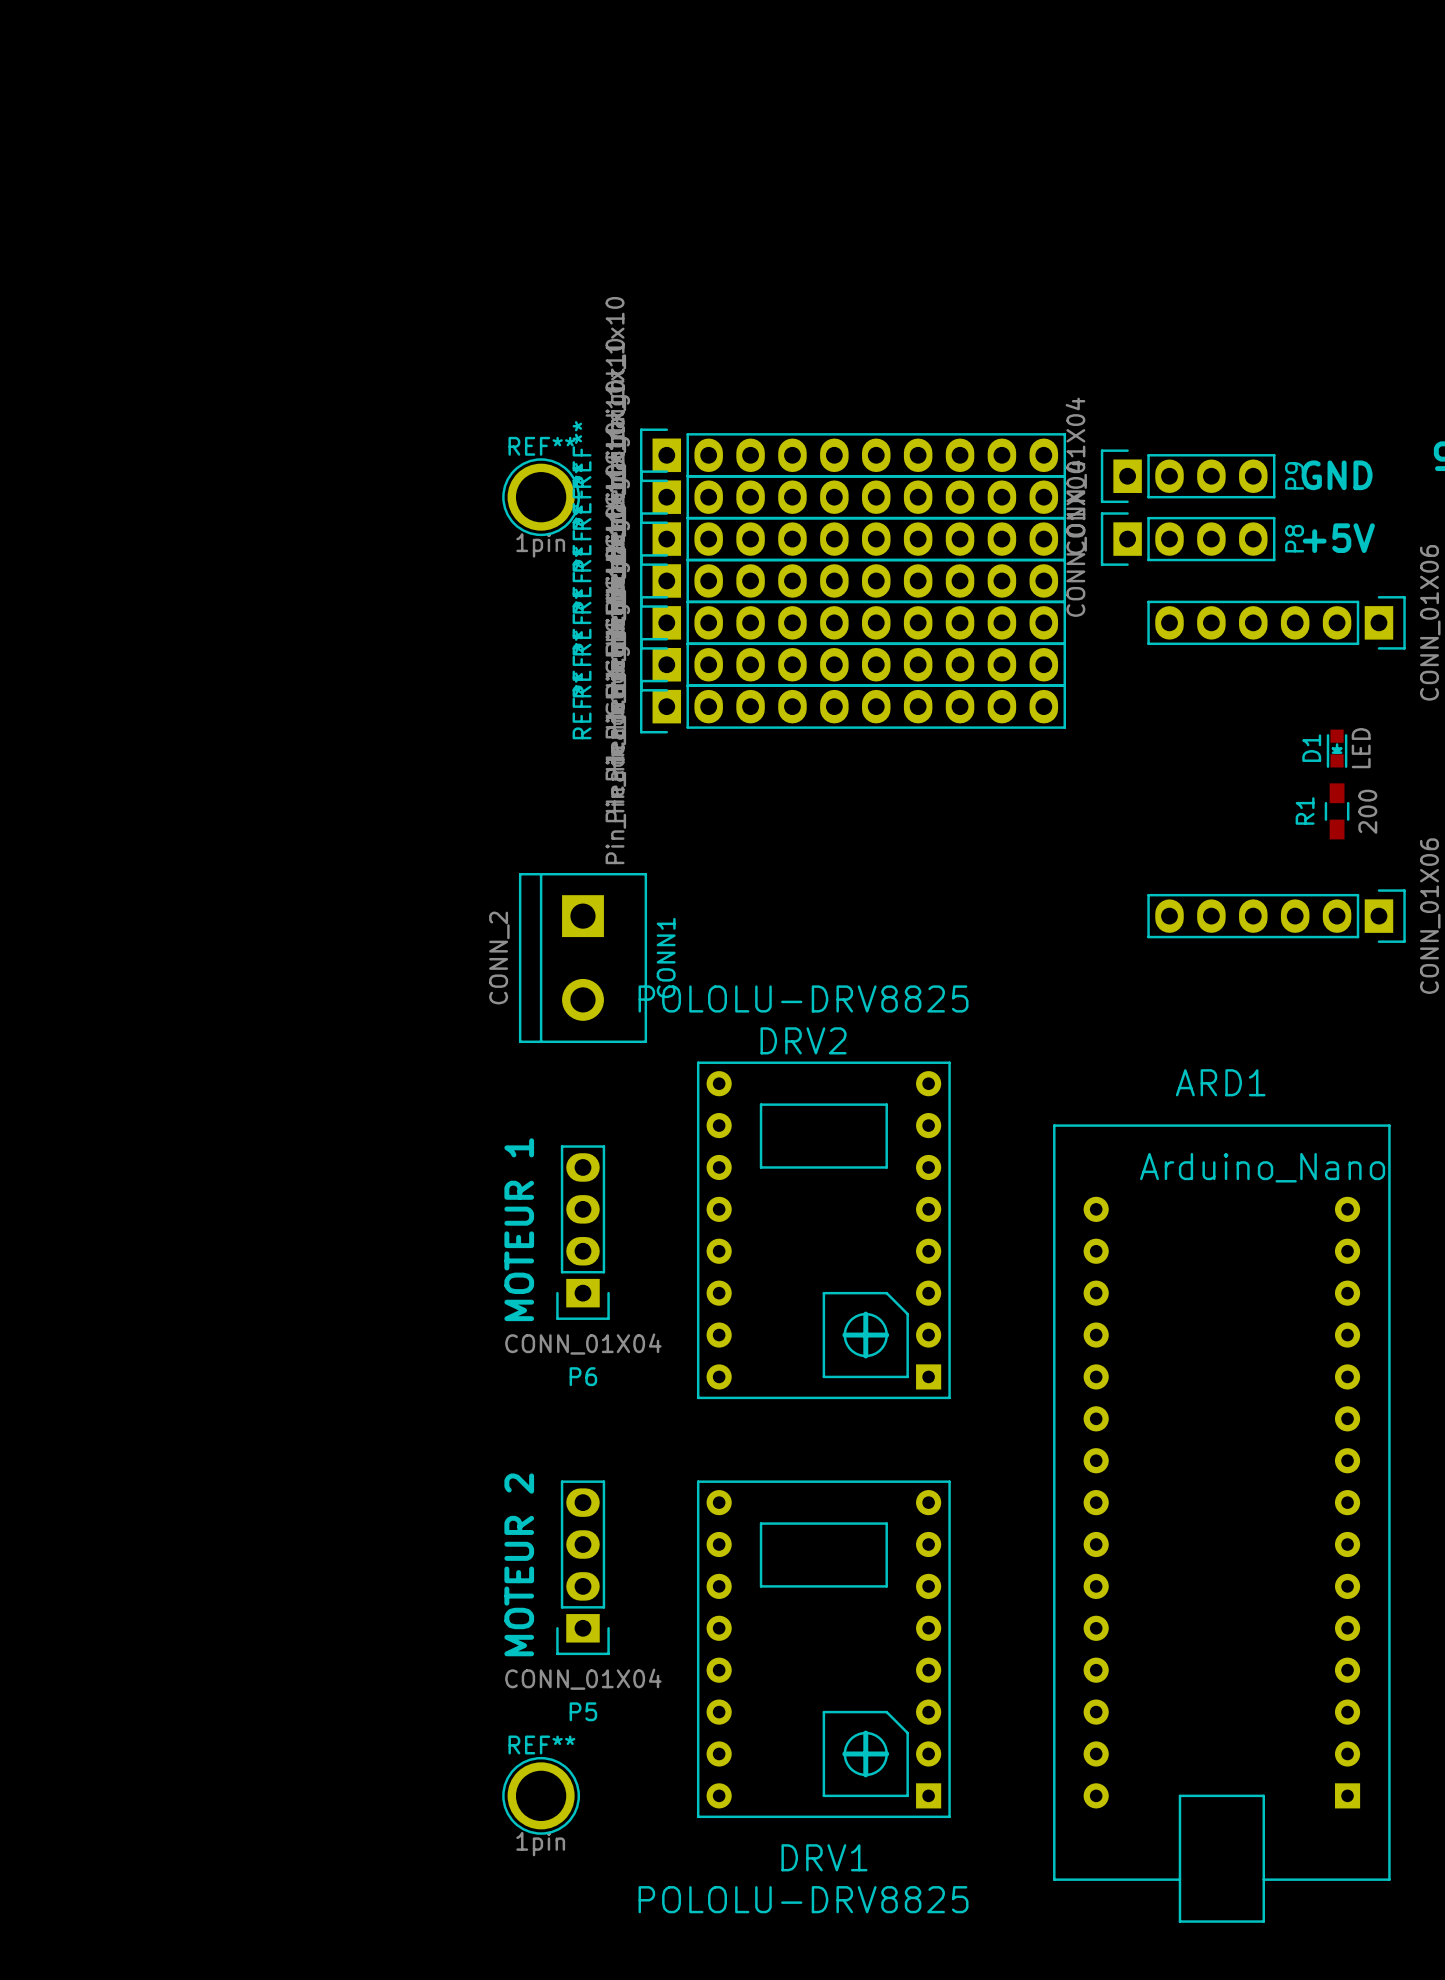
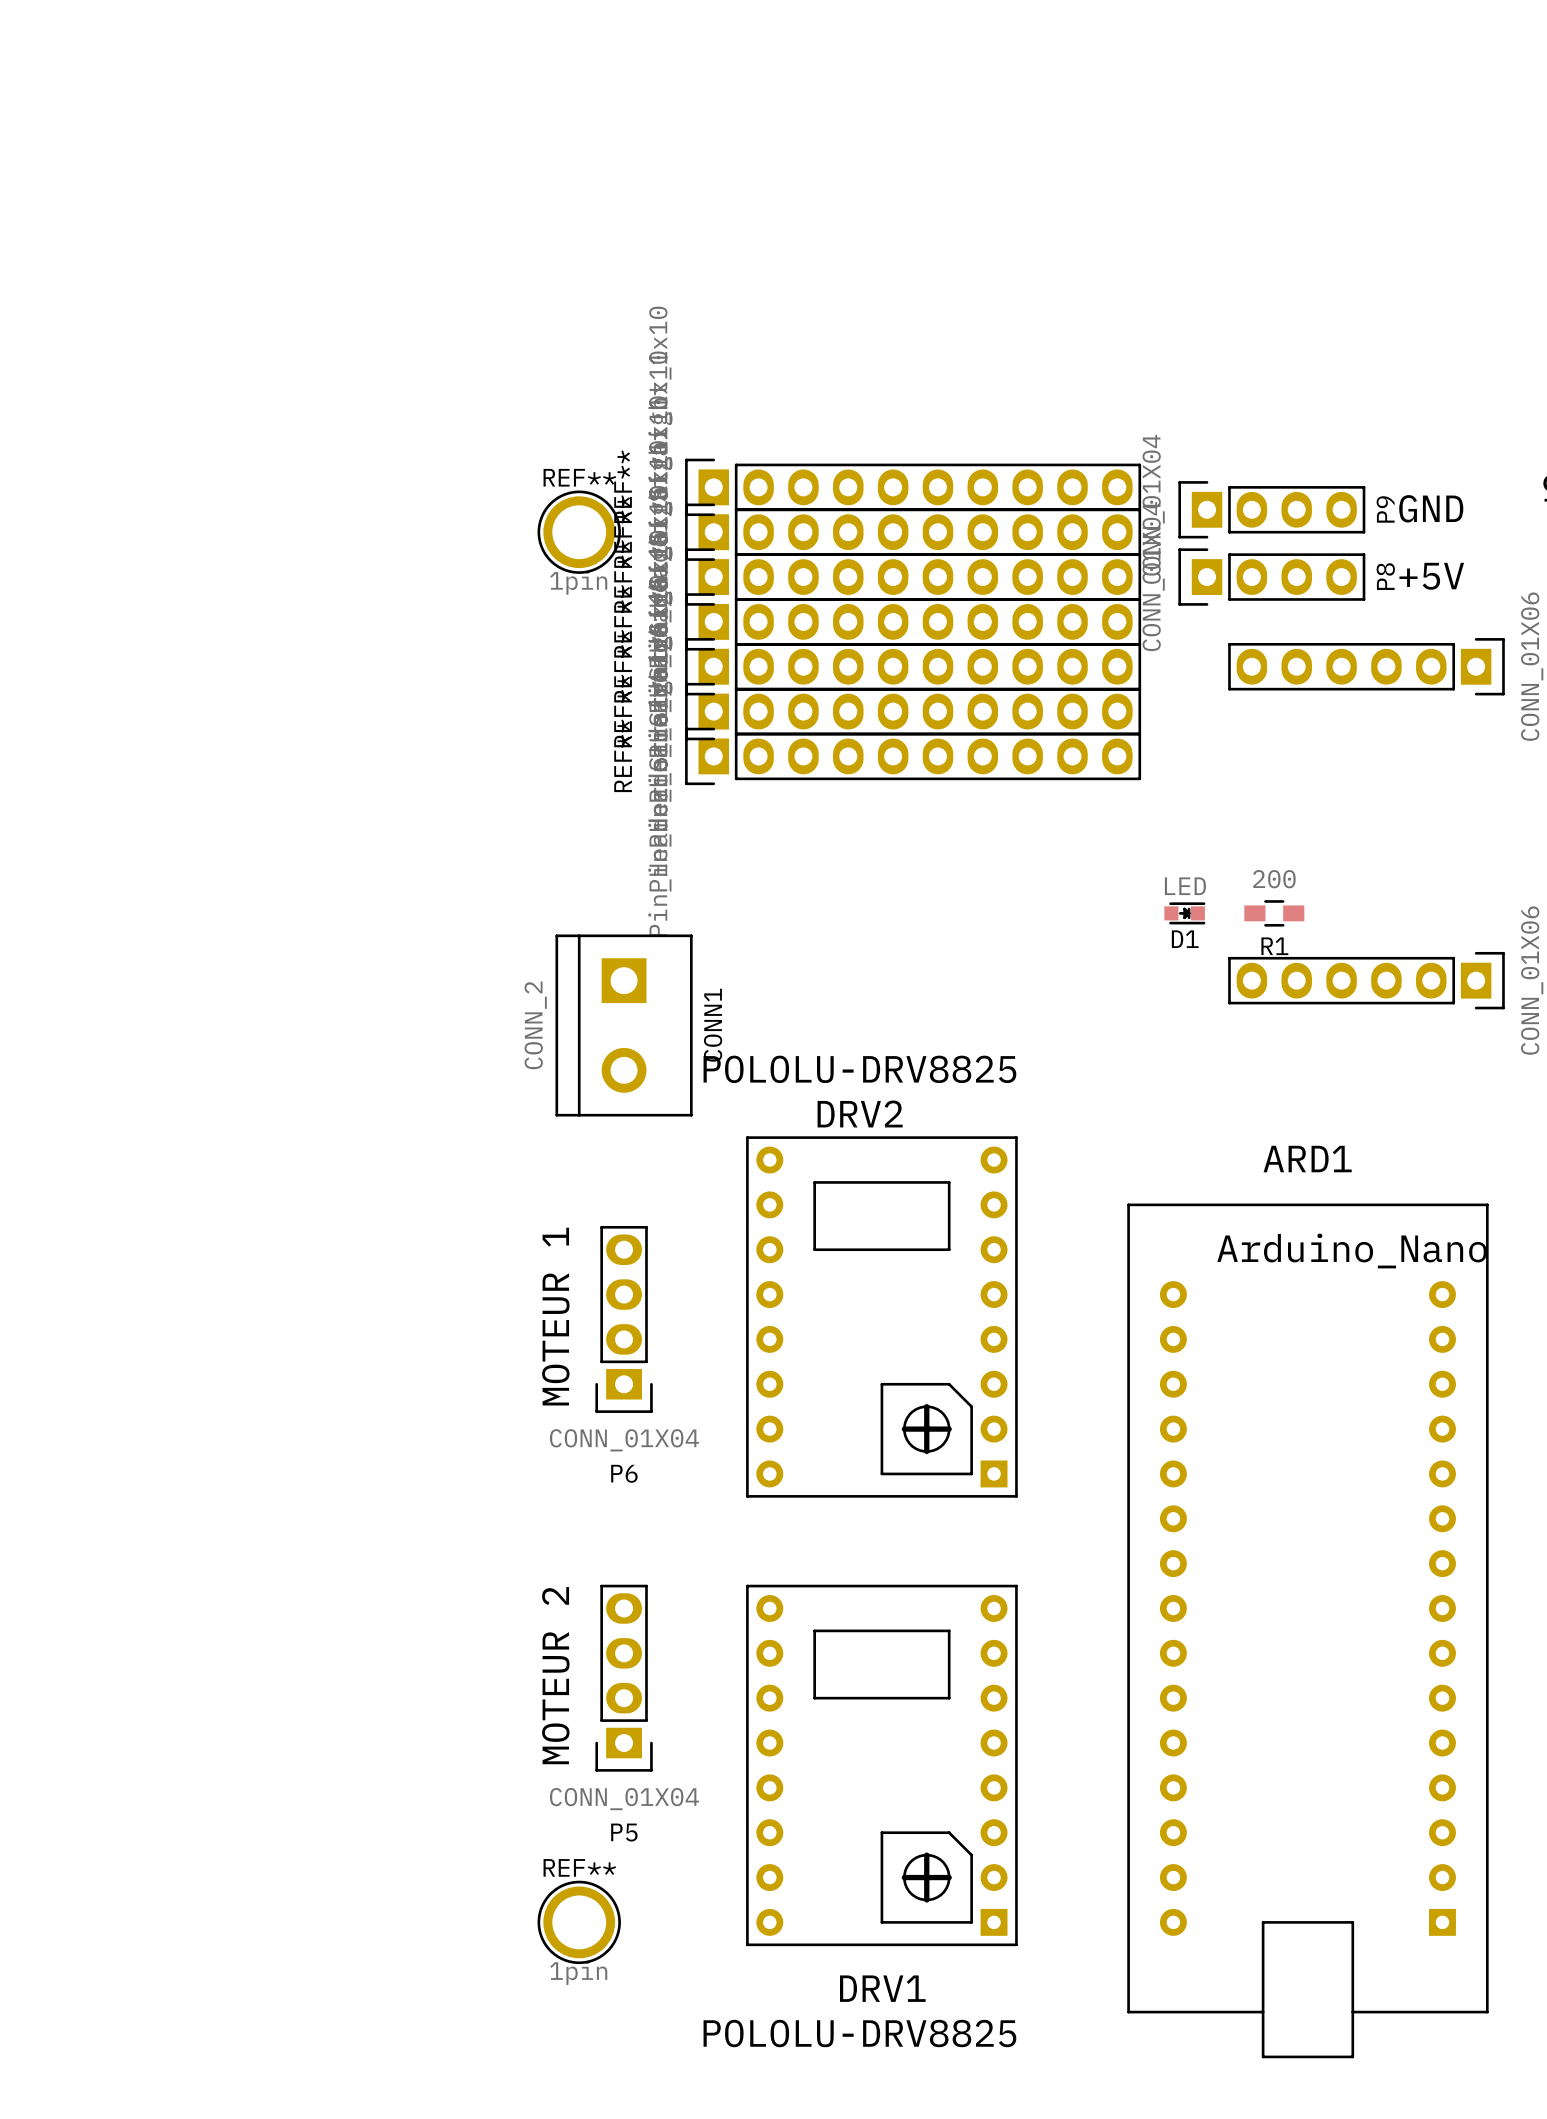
D1 rotation: 0° (1337, 748) -> 90° counterclockwise (1184, 913)
D1 position: (1337, 748) -> (1184, 913)
R1 name position: R1 (1305, 810) -> R1 (1274, 946)
R1 rotation: 0° (1337, 811) -> 90° clockwise (1274, 913)
R1 position: (1337, 811) -> (1274, 913)
R1 value position: 200 (1367, 811) -> 200 (1274, 879)

